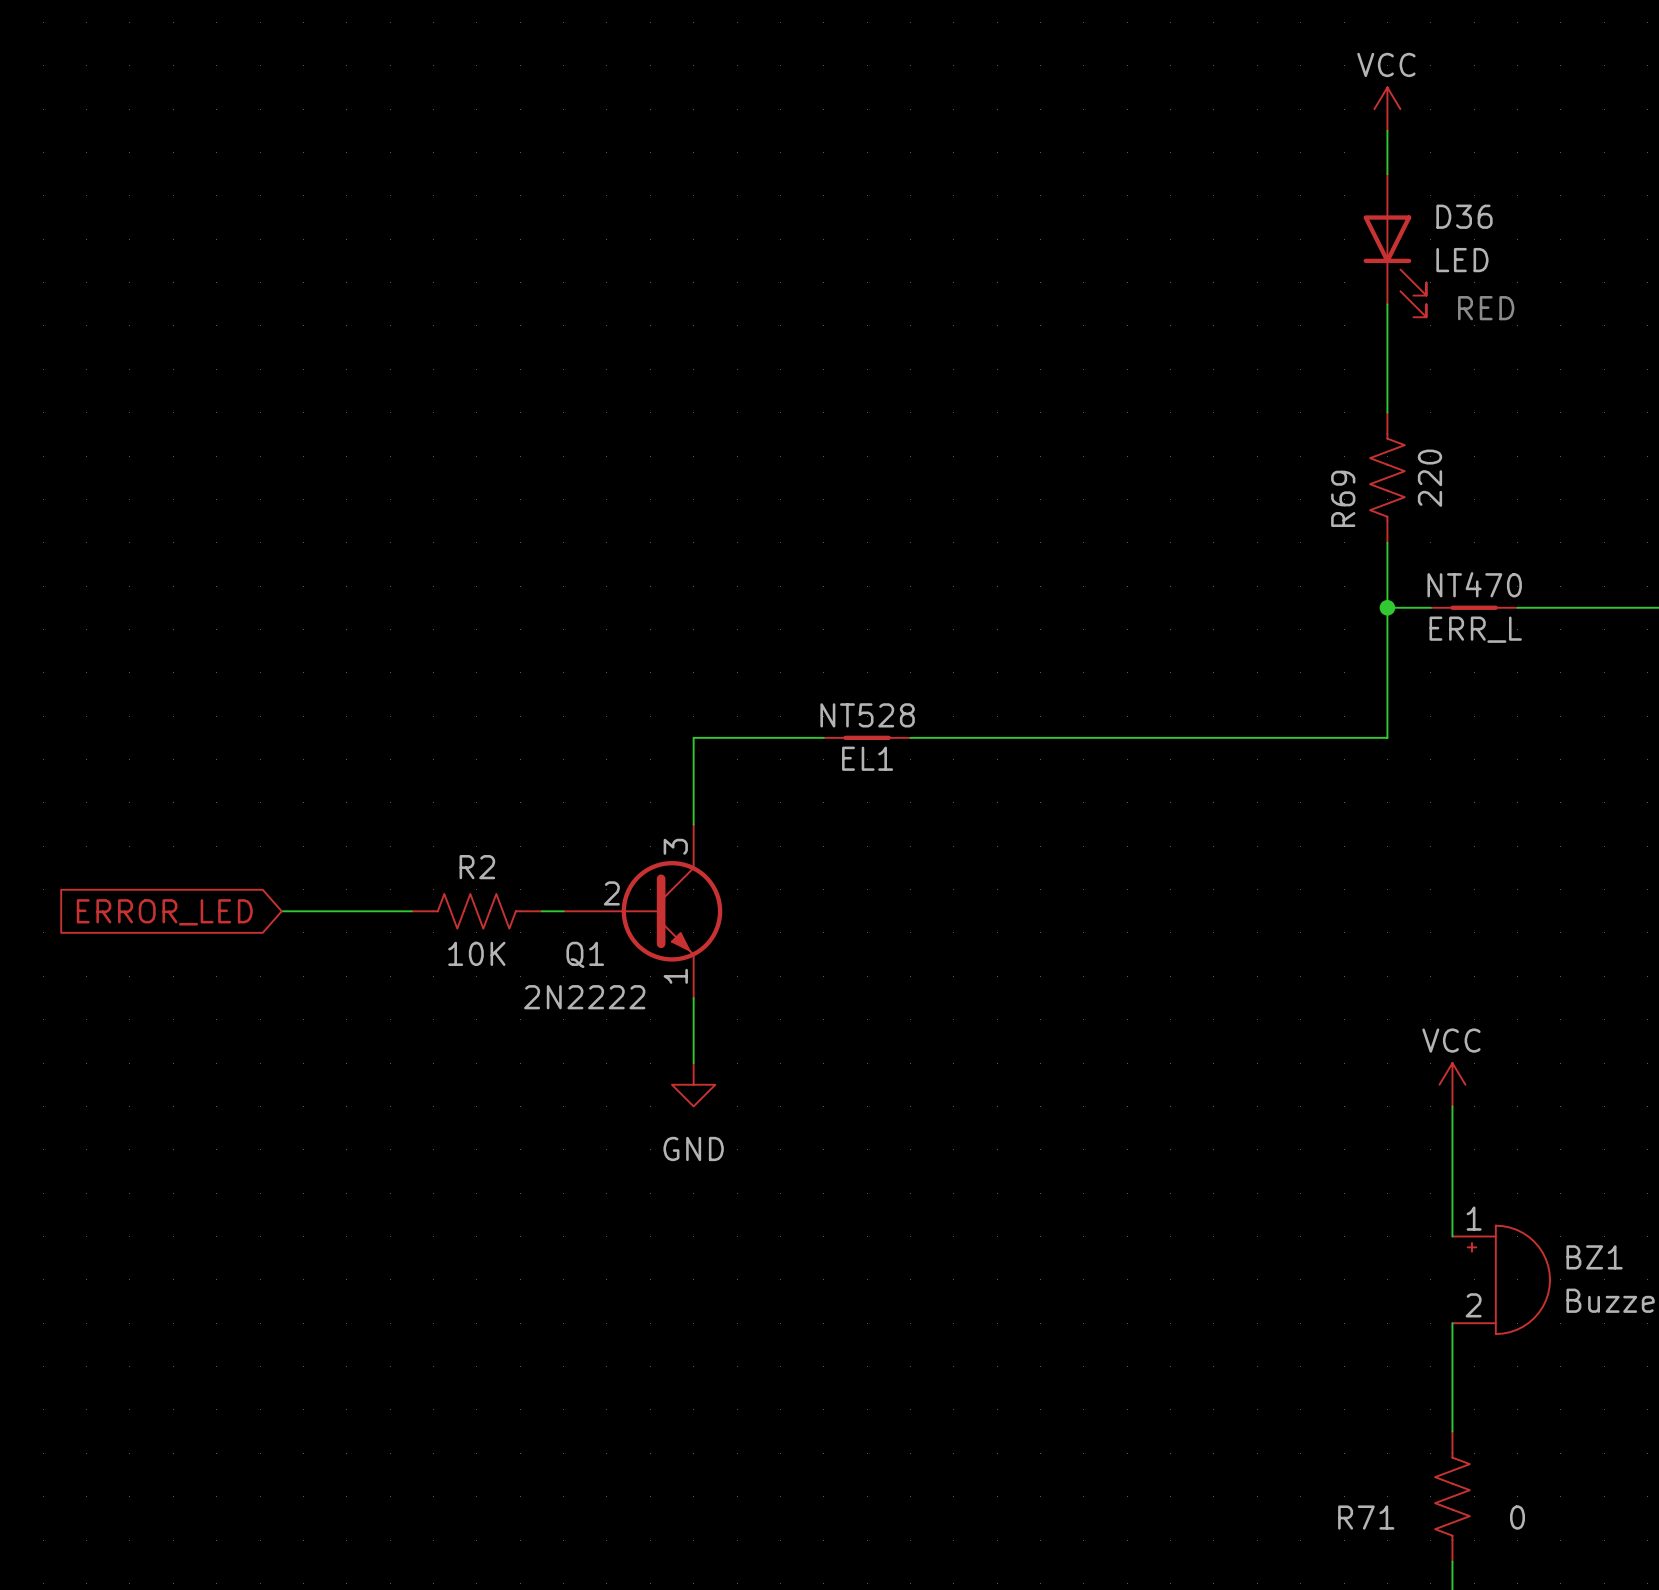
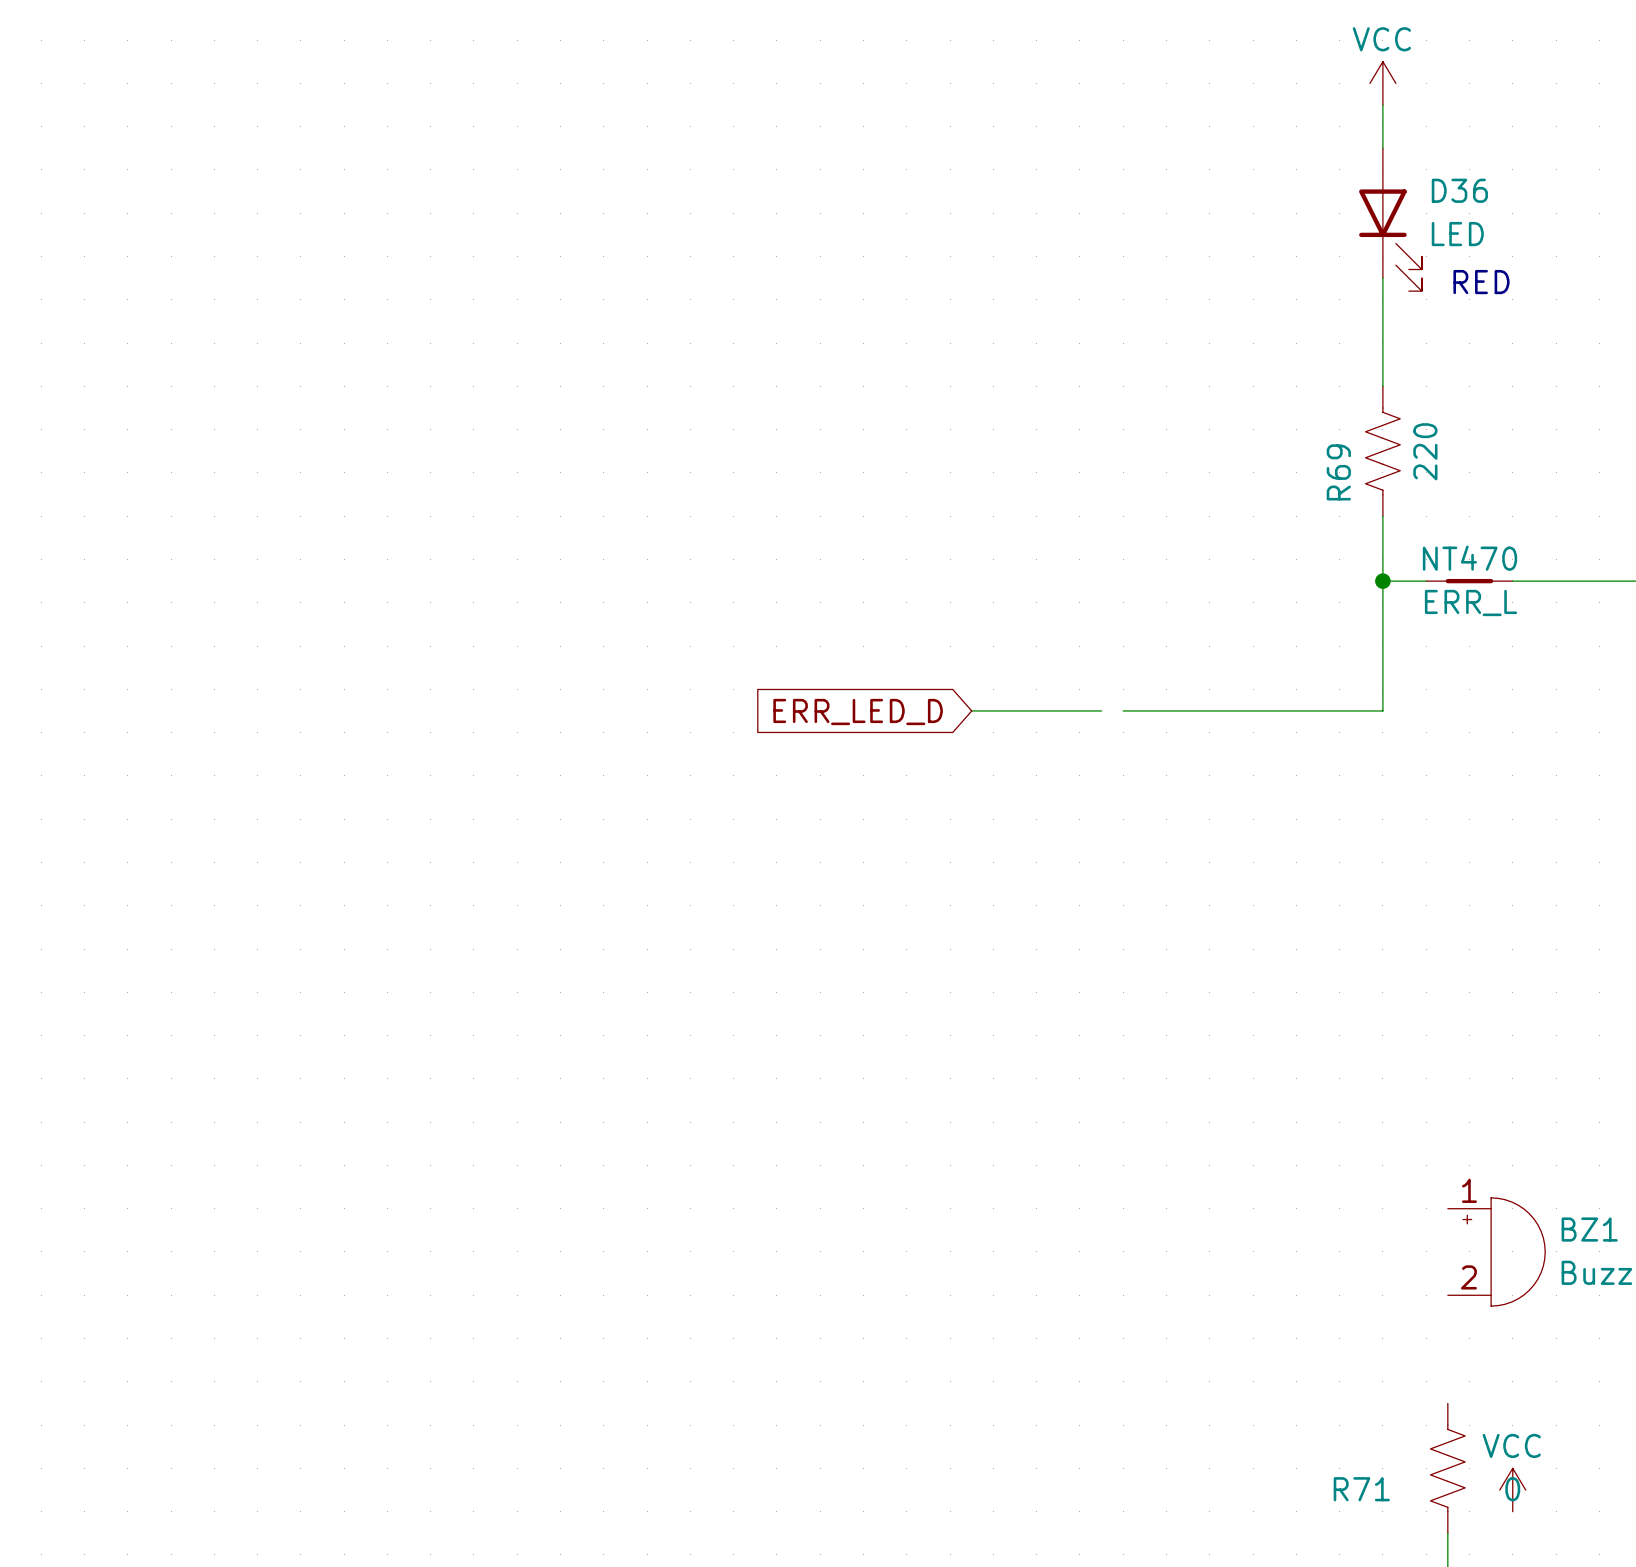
wire: (823, 737) (693, 737) (693, 824) -> none
NT528: EL1 (867, 737) -> none
wire: (910, 737) (975, 737) -> none
wire: (1105, 737) (1127, 737) -> none
global label: none -> ERR_LED_D (858, 712)
wire: (281, 911) (411, 911) -> none
R2: 10K (476, 911) -> none
wire: (541, 911) (563, 911) -> none
Q1: 2N2222 (642, 911) -> none
global label: ERROR_LED (164, 912) -> none
wire: (693, 998) (693, 1063) -> none
power symbol: GND (693, 1084) -> none
power symbol: VCC (1452, 1084) -> none
wire: (1452, 1106) (1452, 1236) -> none
wire: (1452, 1323) (1452, 1431) -> none
power symbol: none -> VCC (1512, 1490)

